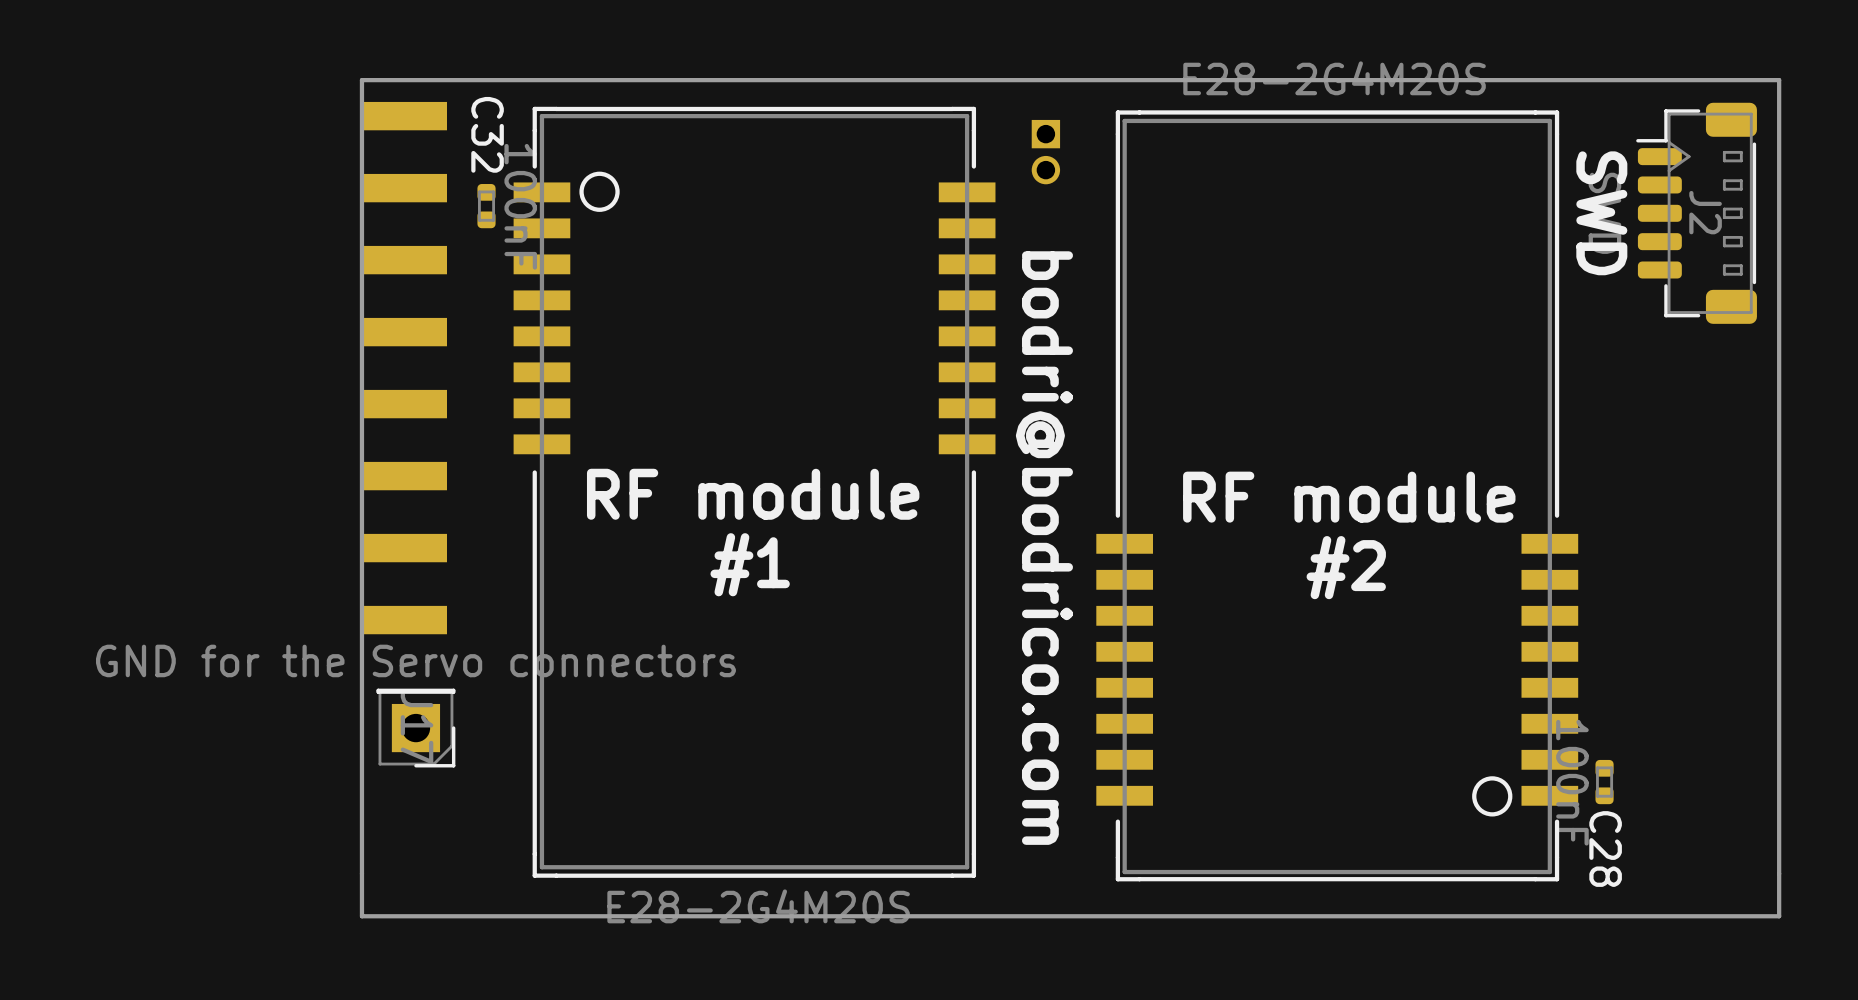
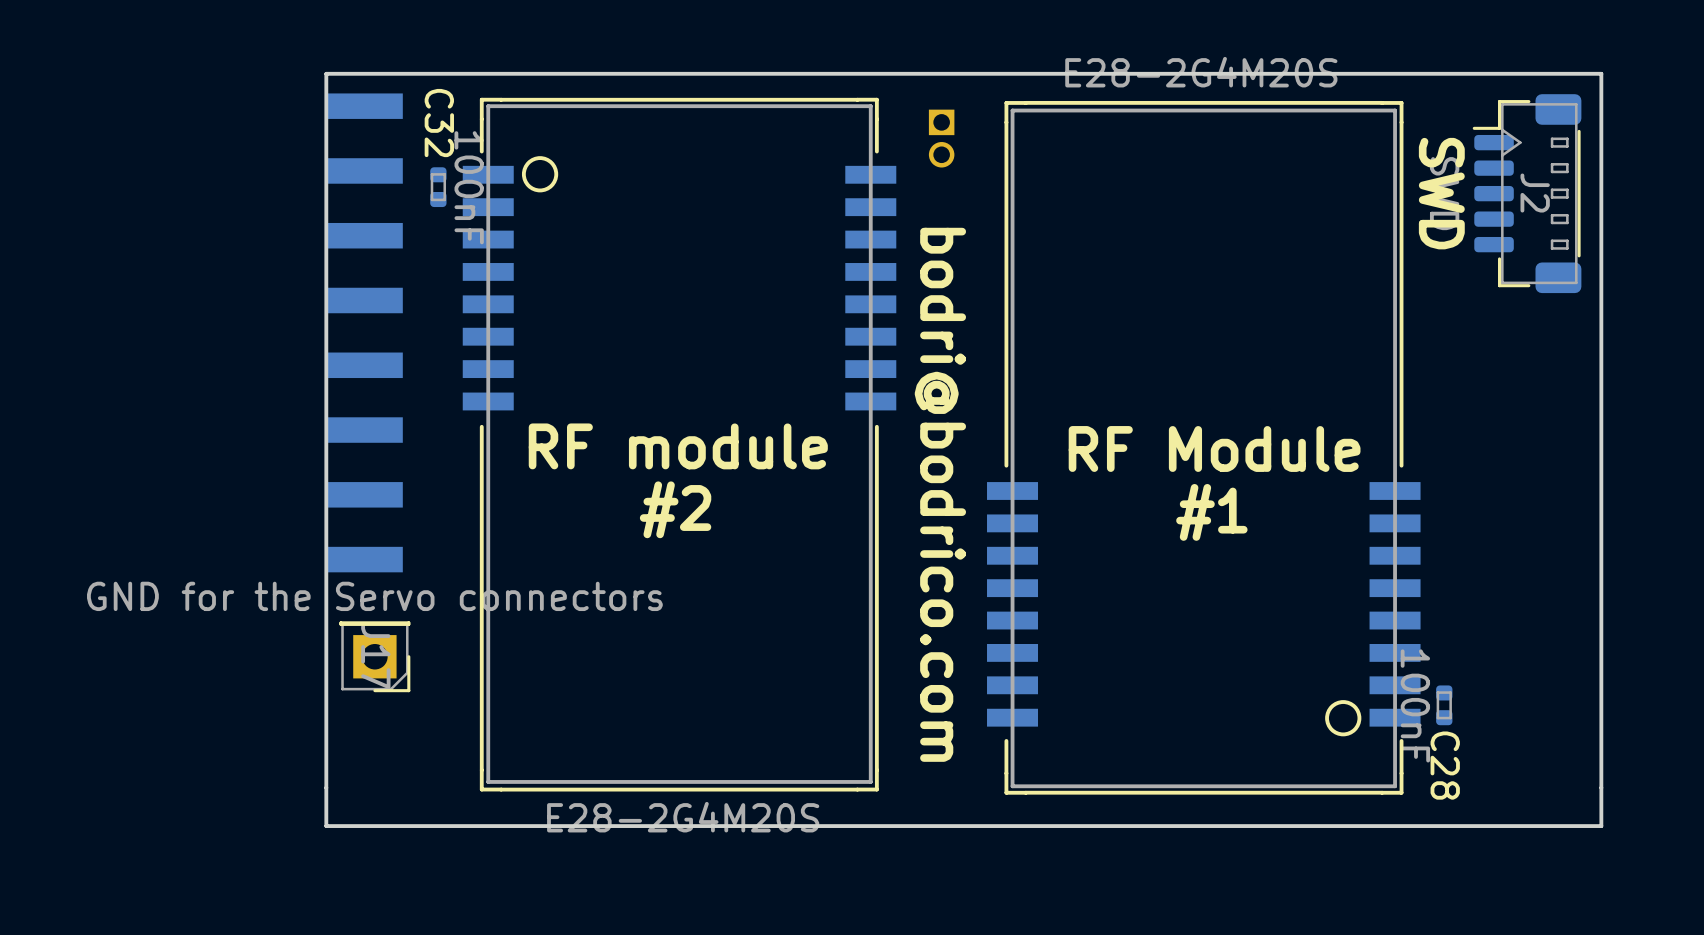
text: RF module (1349, 497) -> RF Module (1214, 448)
text: #1 (750, 564) -> #2 (675, 509)
text: #2 (1346, 567) -> #1 (1211, 512)

